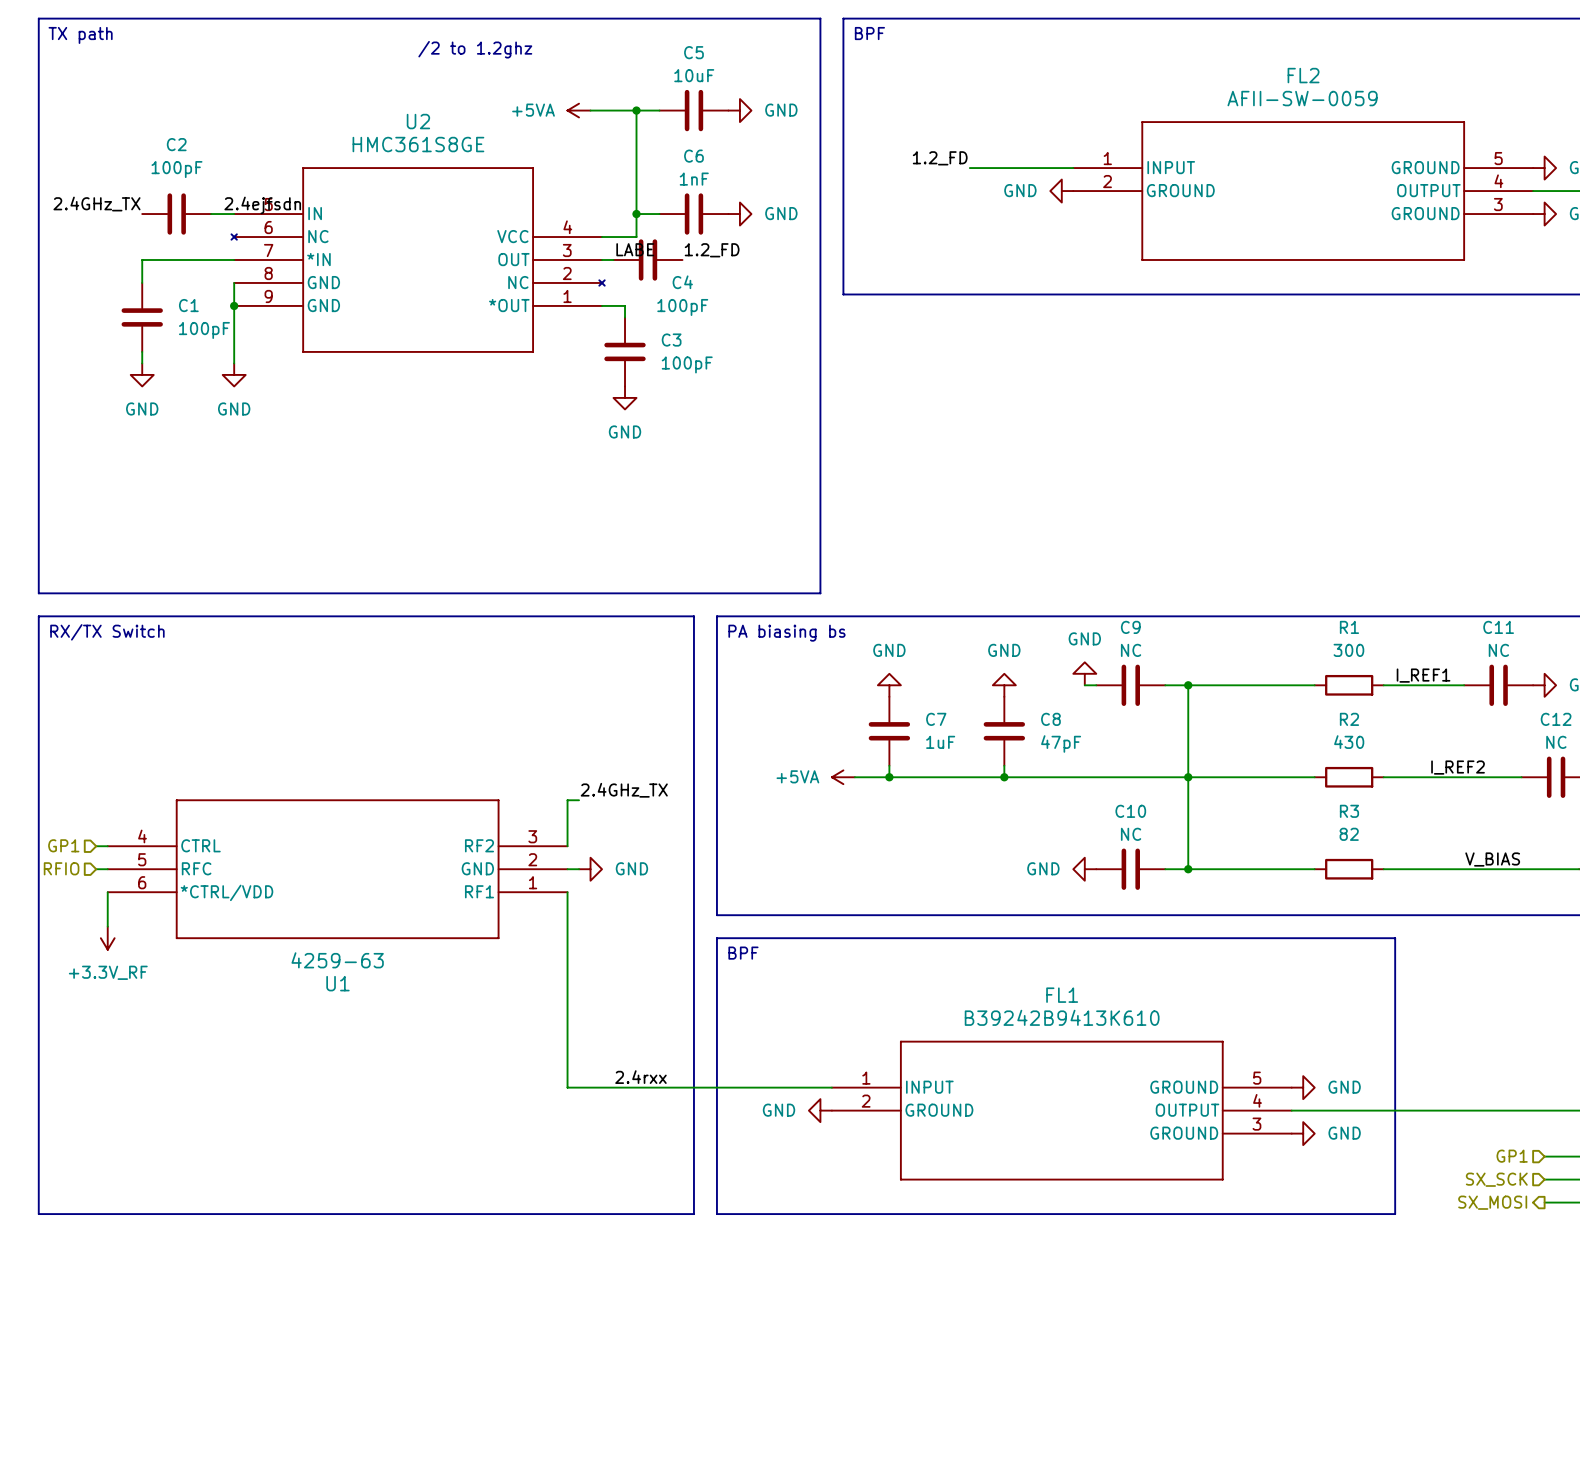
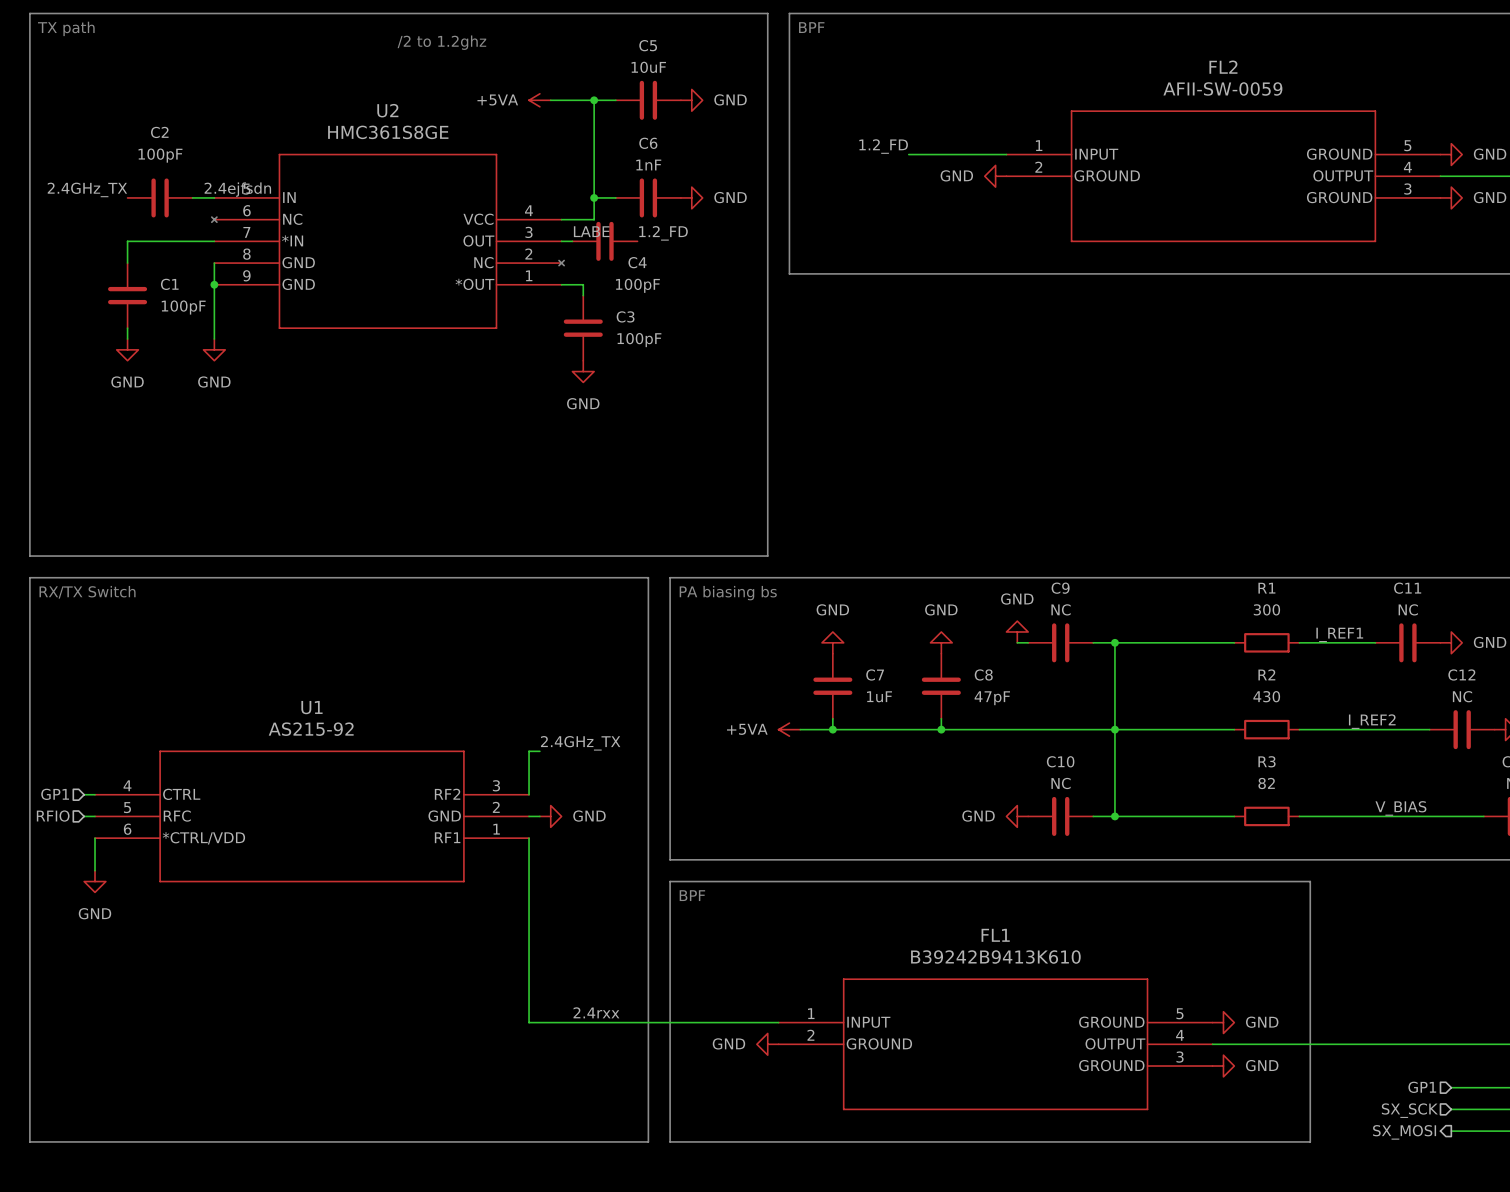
power symbol: +3.3V_RF (107, 938) -> GND (95, 881)
U1 value: 4259-63 (337, 960) -> AS215-92 (311, 729)
U1 name position: U1 (337, 983) -> U1 (311, 707)

